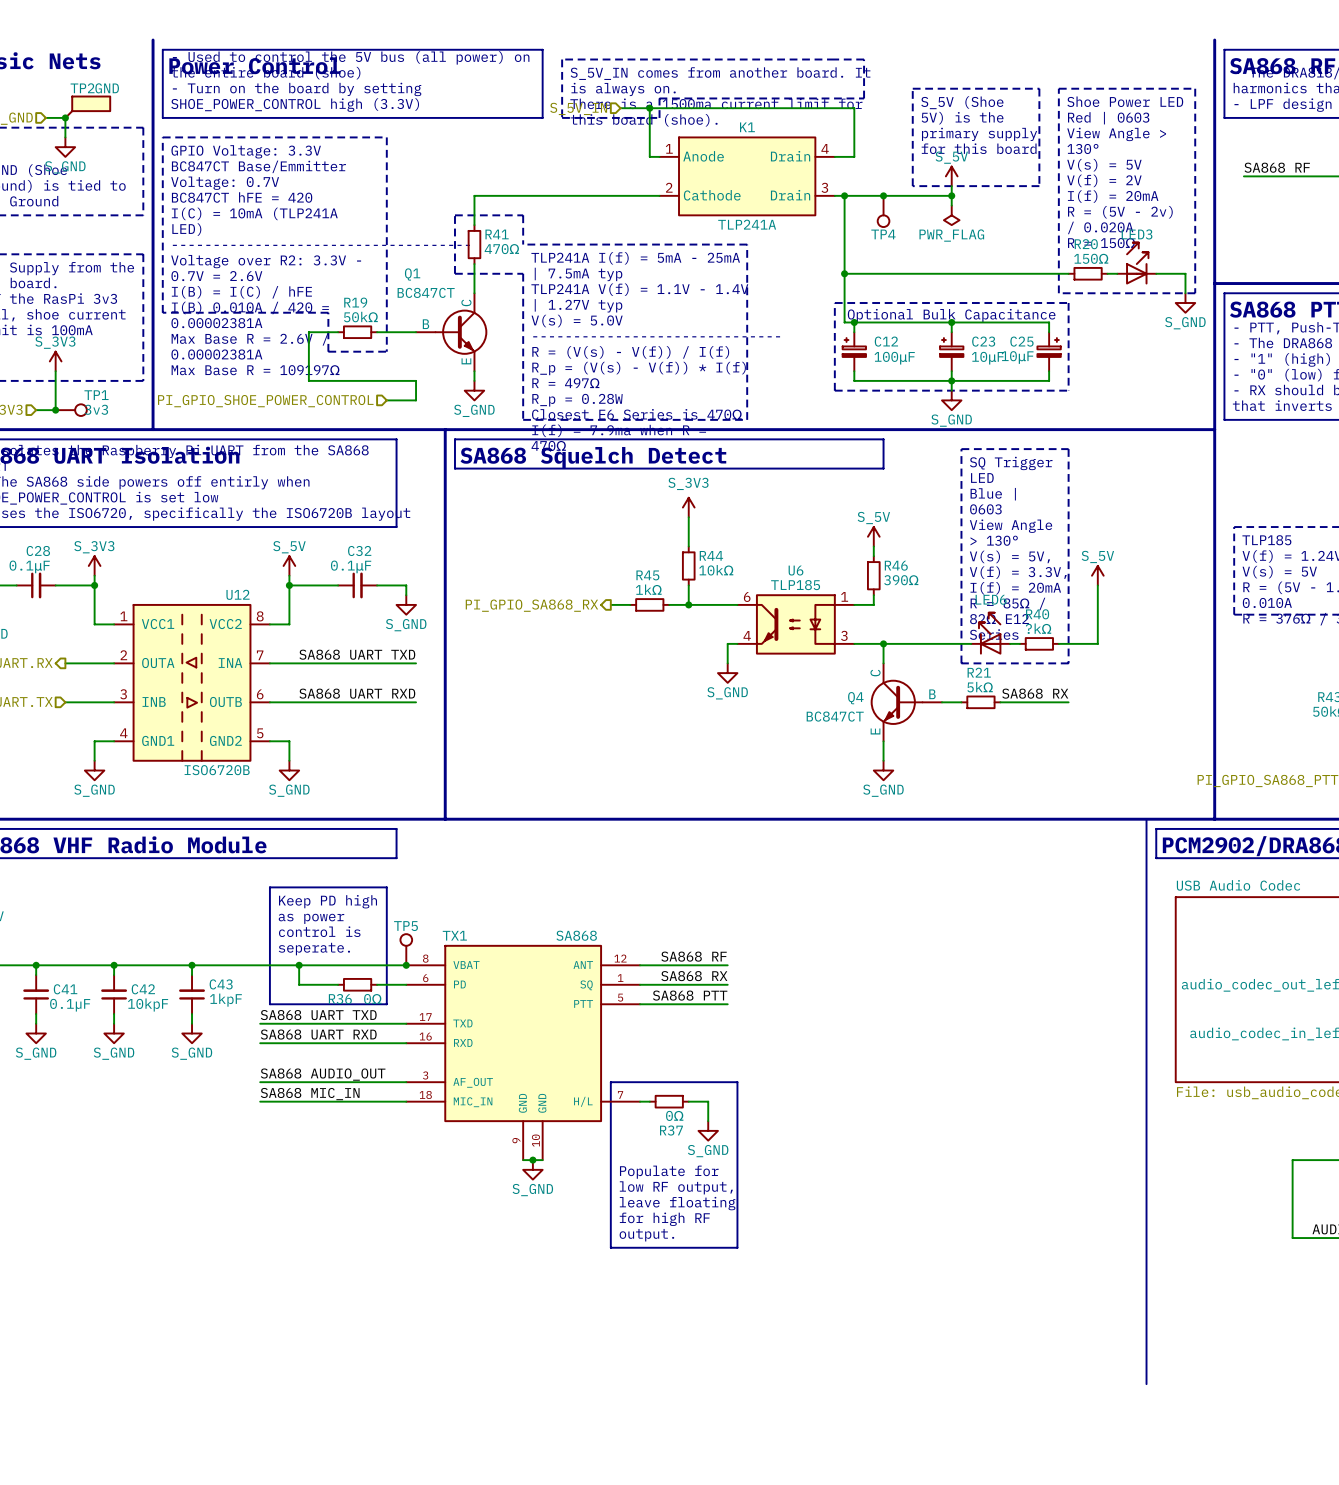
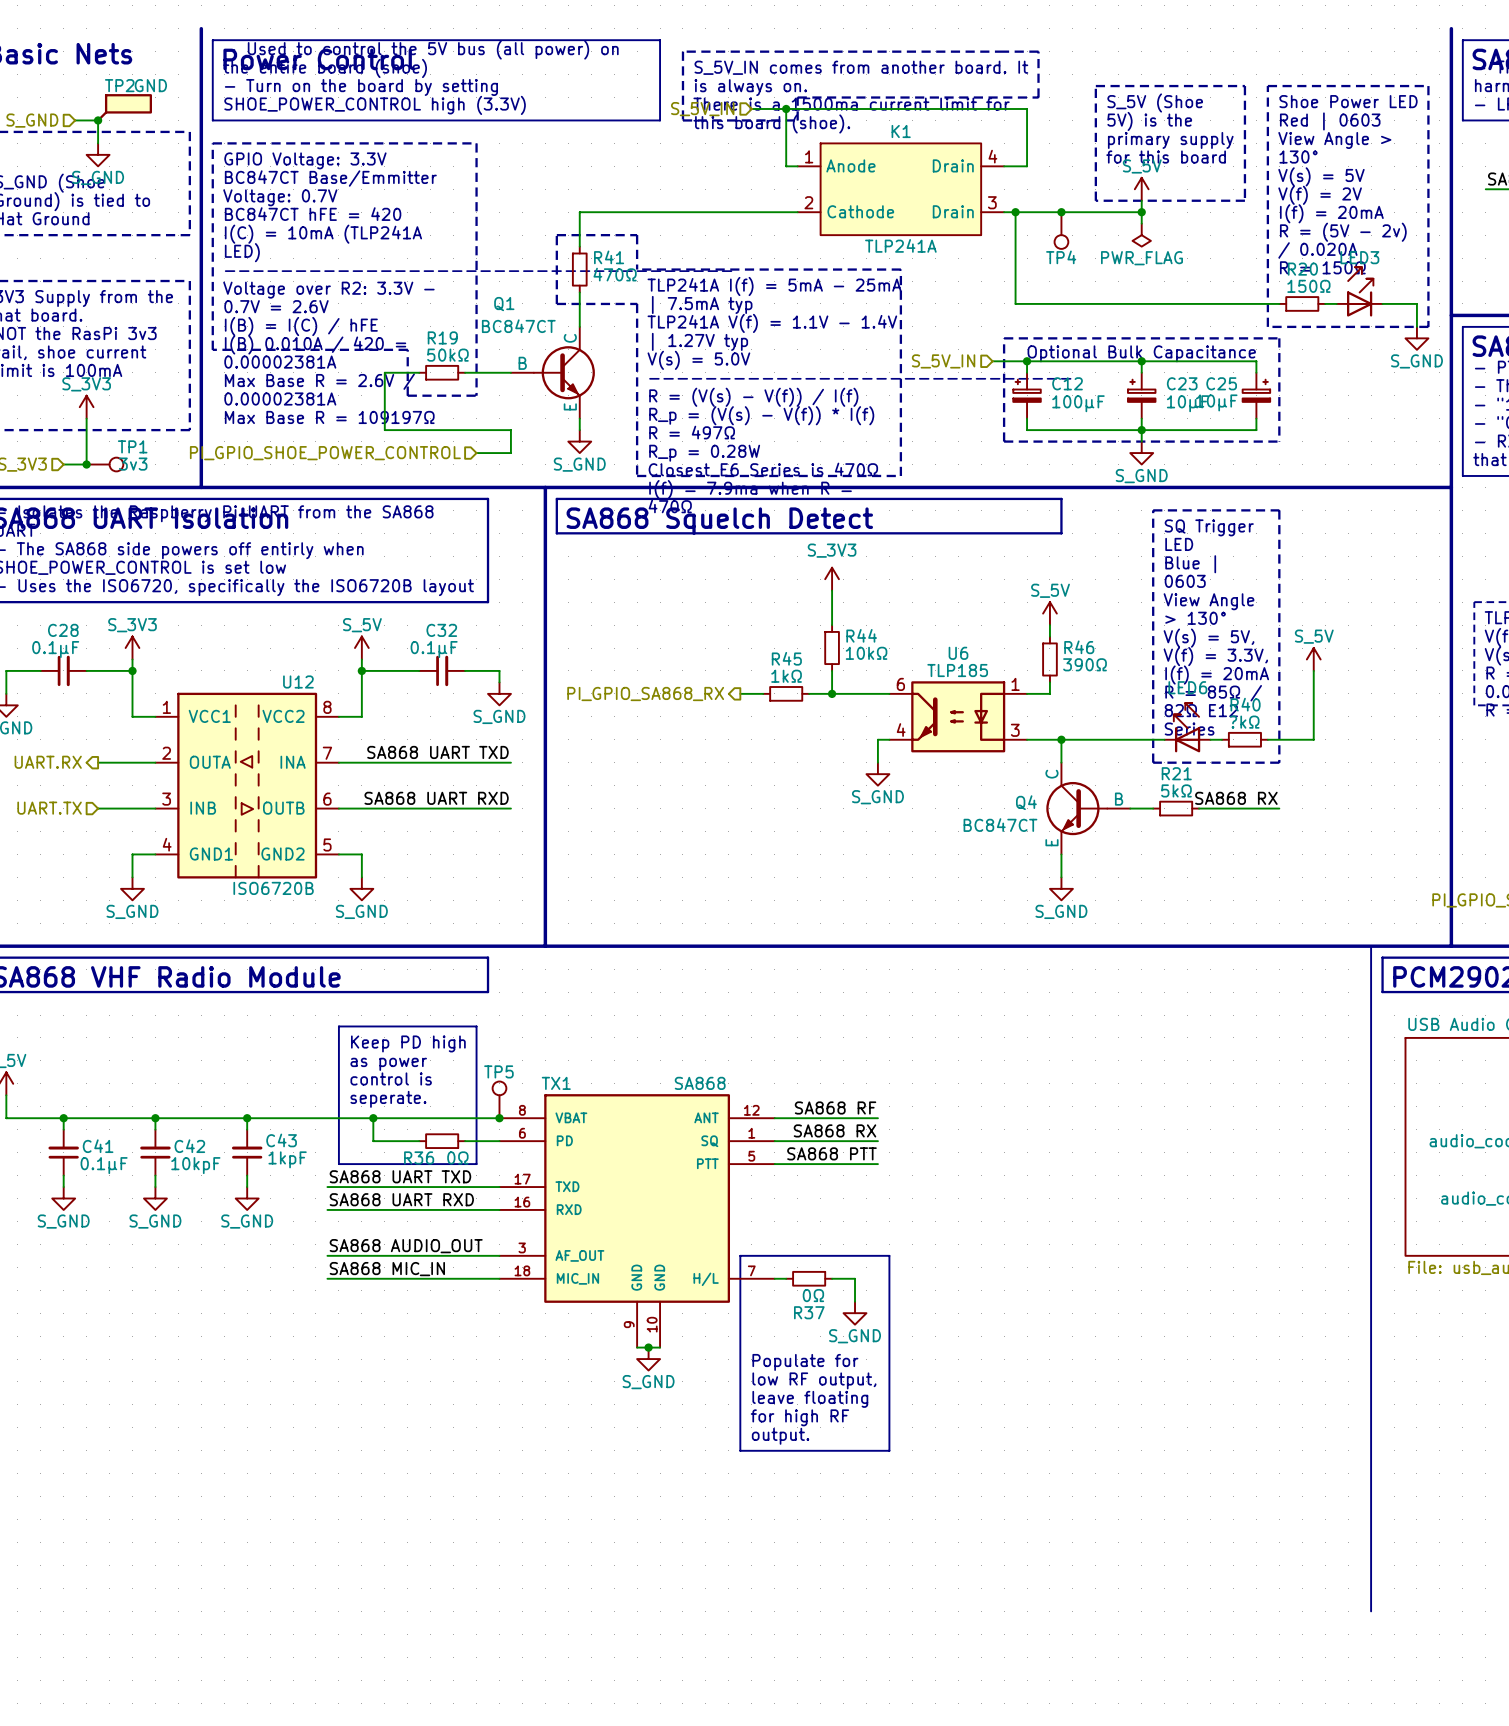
wire: (844, 273) (844, 322) -> (992, 361) (1015, 361)
junction: (844, 273) -> none
hierarchical label: none -> S_5V_IN (943, 361)

